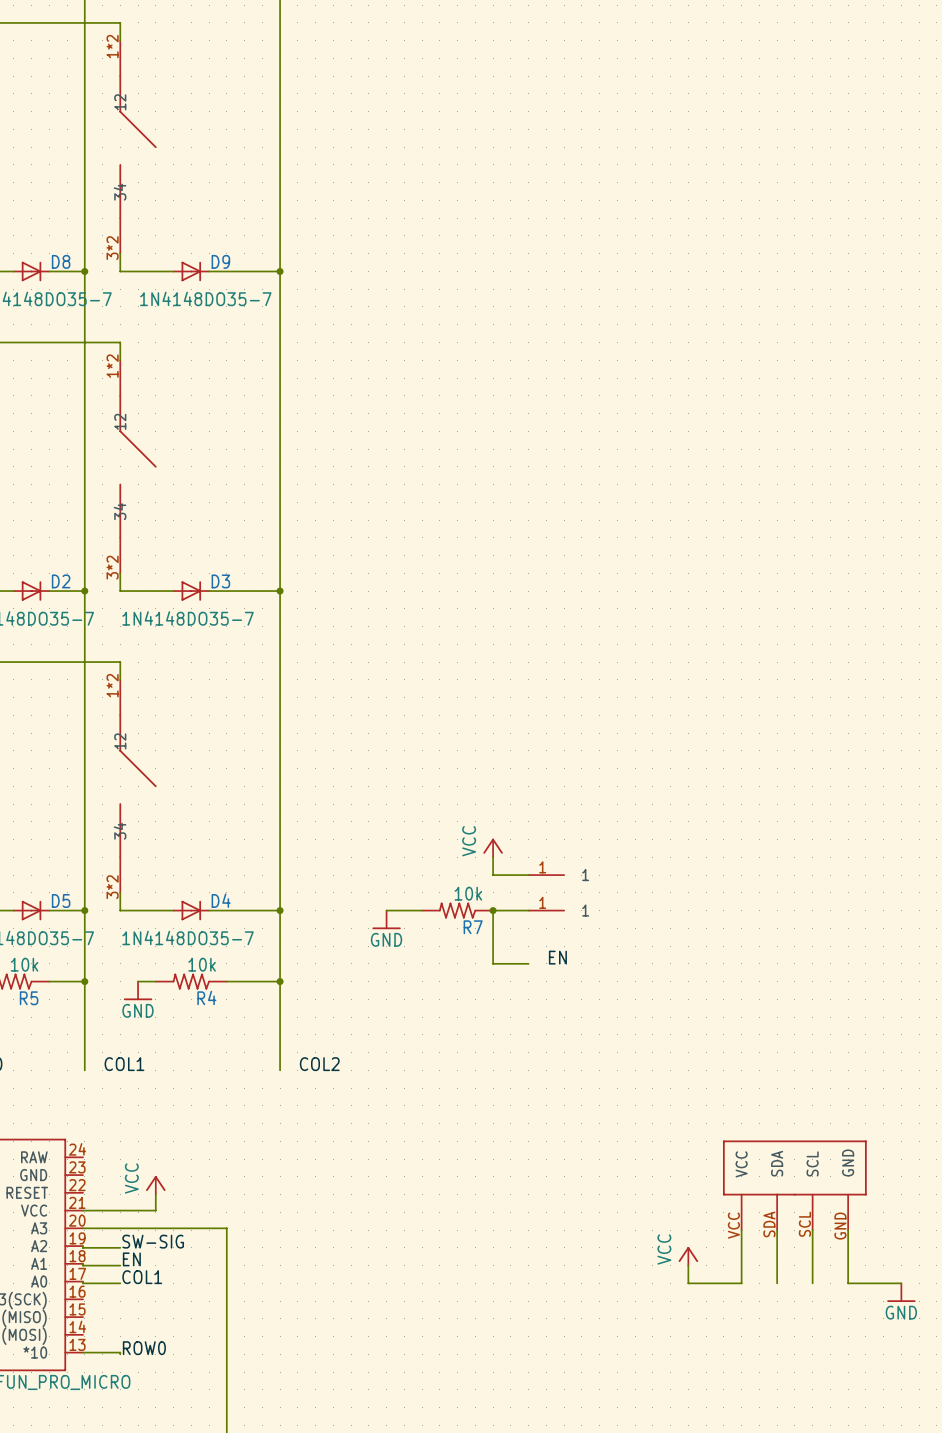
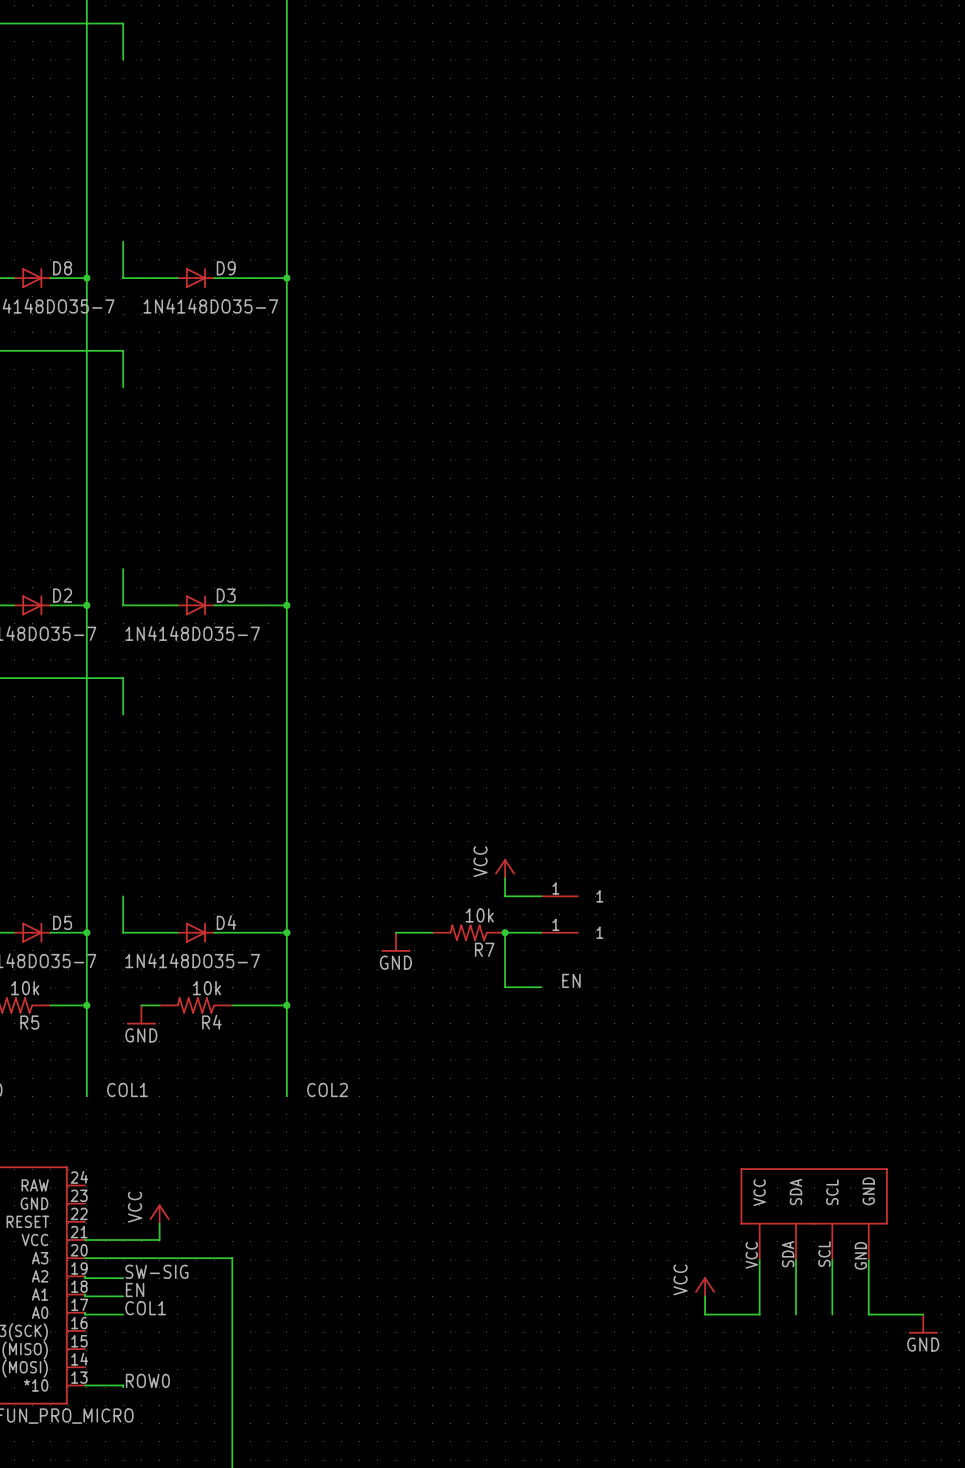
part: (138, 147) -> none
part: (138, 466) -> none
part: (138, 786) -> none

